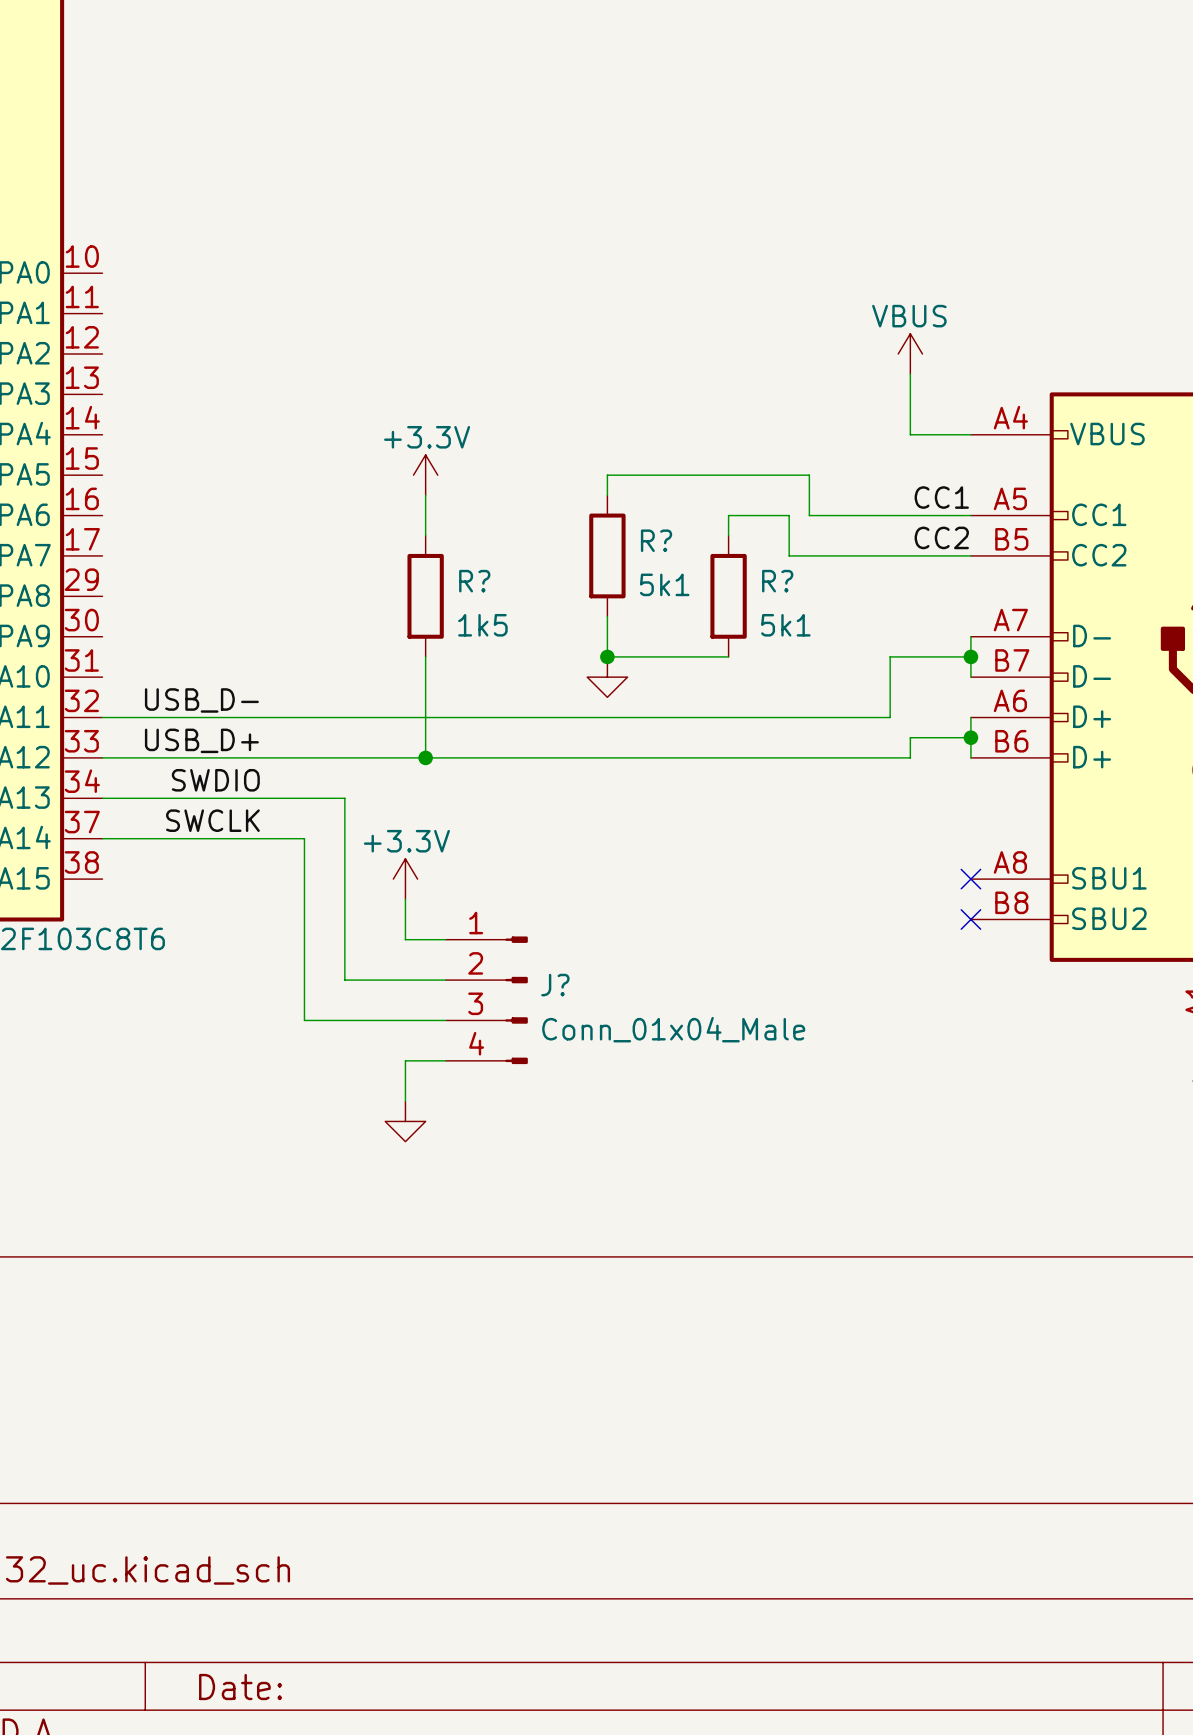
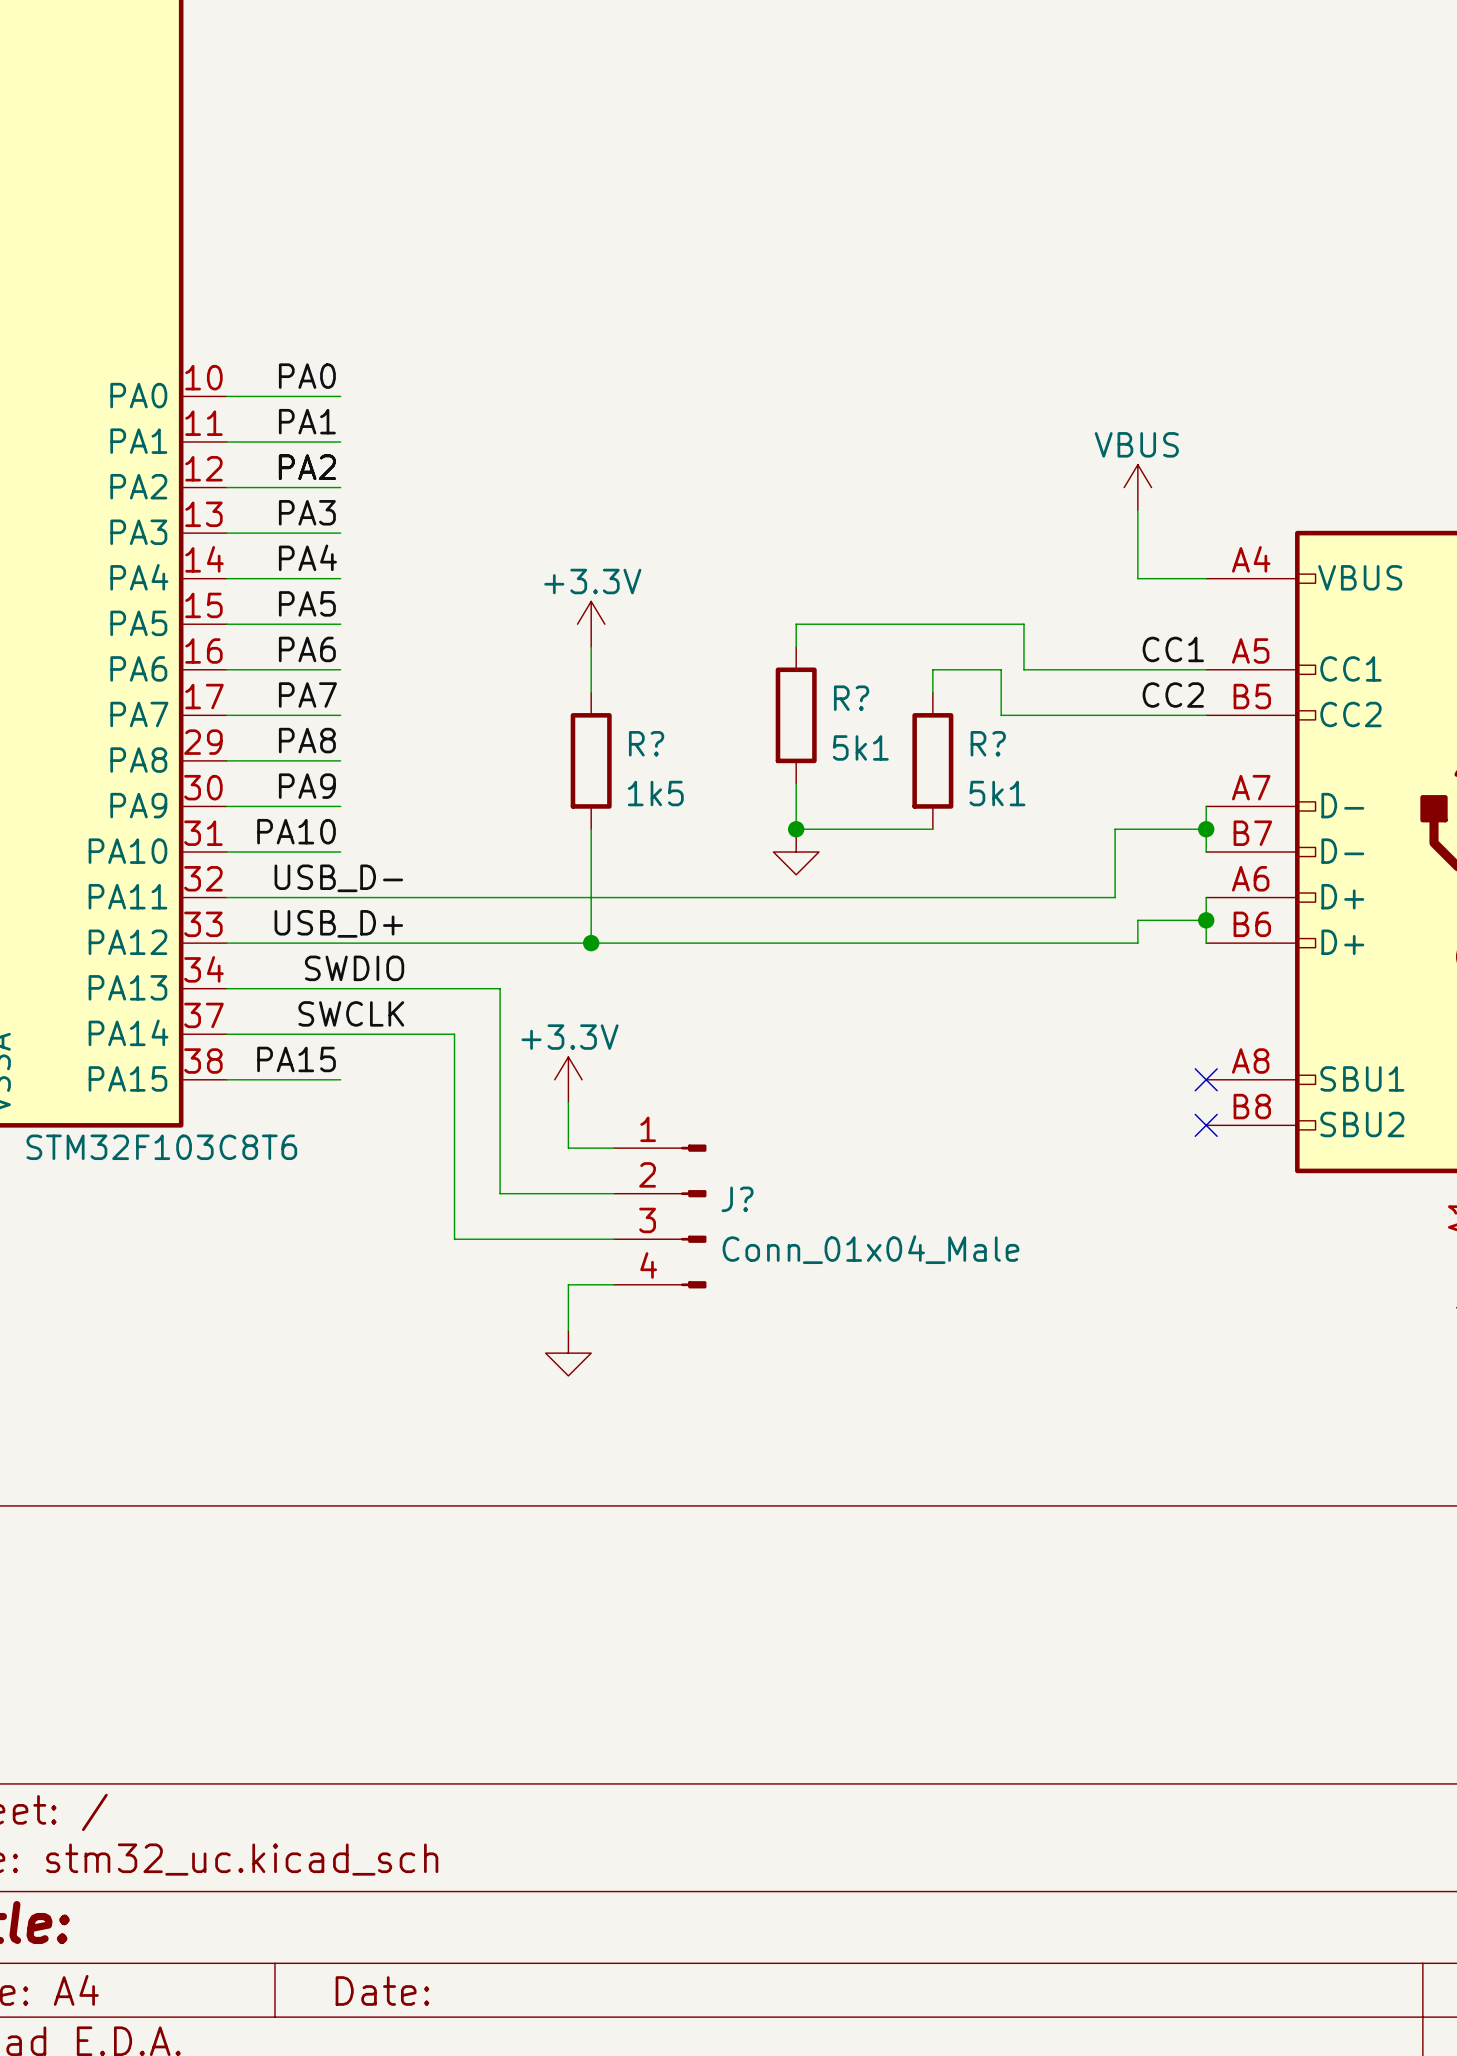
label: none -> PA0 (307, 376)
wire: none -> (226, 396) (340, 396)
label: none -> PA1 (307, 421)
wire: none -> (226, 442) (340, 442)
label: none -> PA2 (307, 467)
wire: none -> (226, 487) (340, 487)
label: none -> PA3 (307, 512)
wire: none -> (226, 533) (340, 533)
label: none -> PA4 (307, 557)
wire: none -> (226, 578) (340, 578)
label: none -> PA5 (307, 603)
wire: none -> (226, 624) (340, 624)
label: none -> PA6 (307, 649)
wire: none -> (226, 669) (340, 669)
label: none -> PA7 (307, 695)
wire: none -> (226, 715) (340, 715)
label: none -> PA8 (307, 740)
wire: none -> (226, 760) (340, 760)
label: none -> PA9 (307, 786)
wire: none -> (226, 806) (340, 806)
label: none -> PA10 (296, 831)
wire: none -> (226, 852) (340, 852)
label: none -> PA15 (296, 1059)
wire: none -> (226, 1079) (340, 1079)

